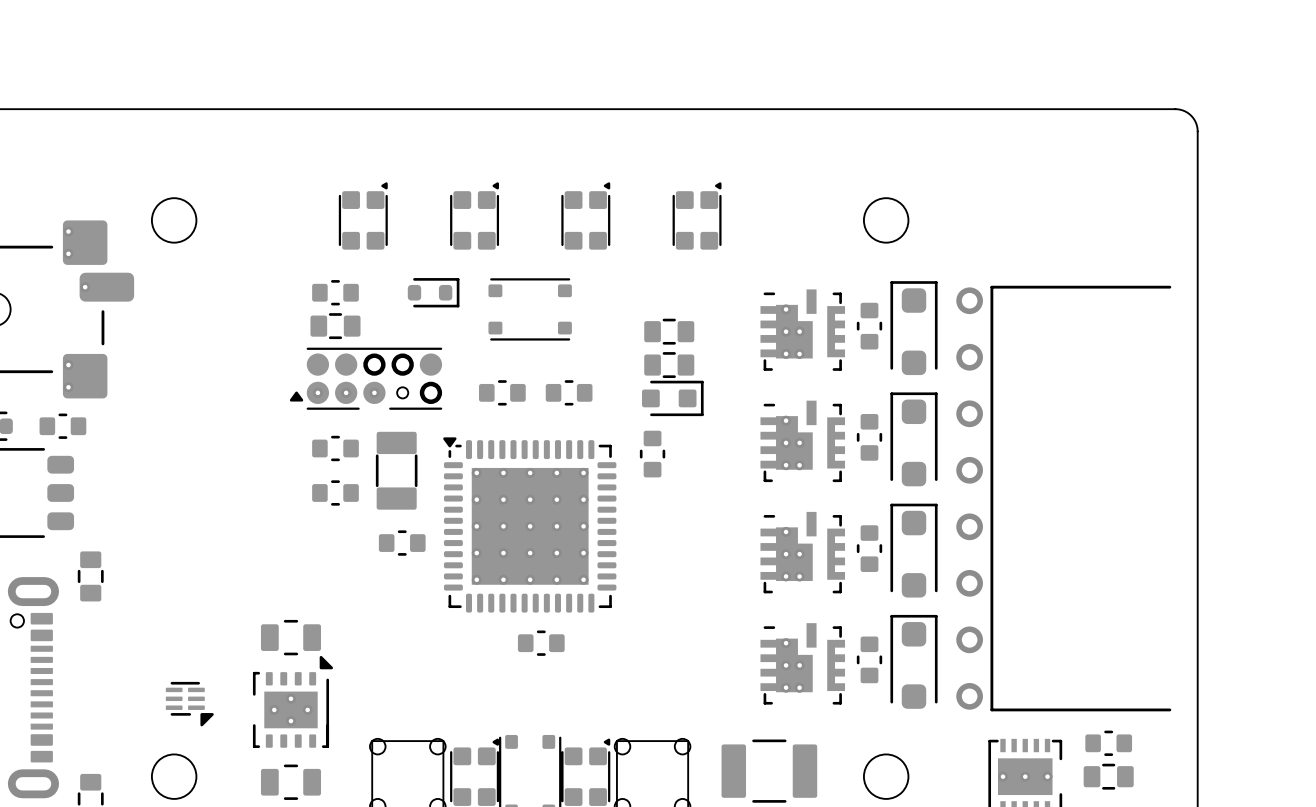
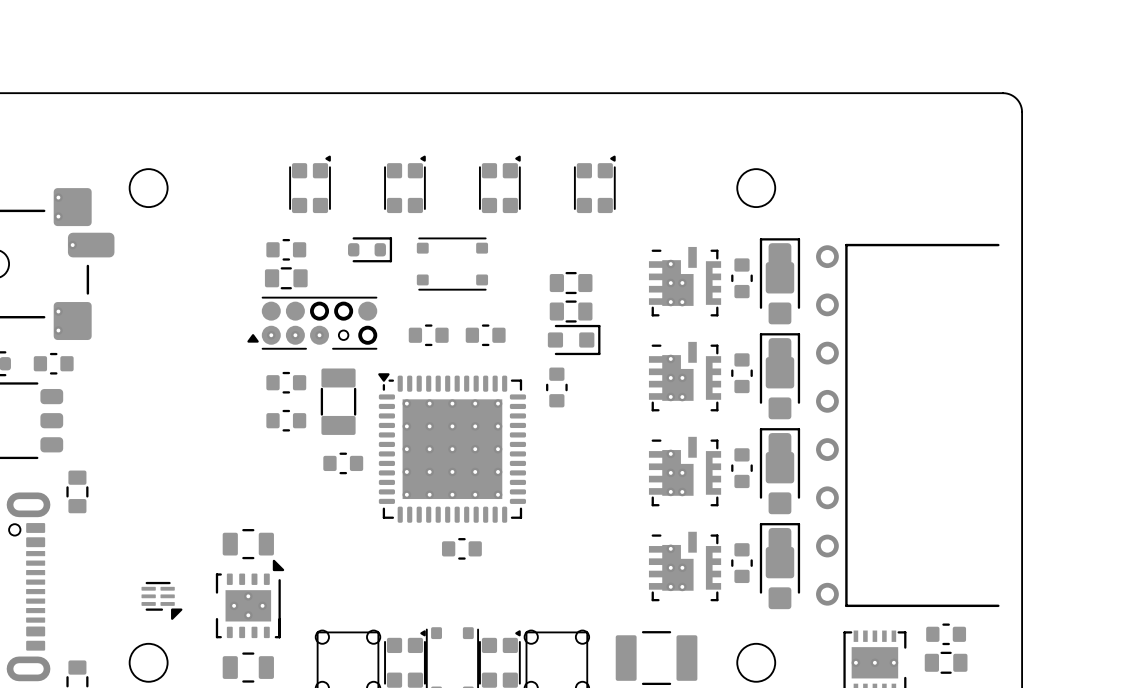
part footprint: [890, 281, 938, 376] -> [759, 238, 801, 325]
part footprint: [890, 392, 938, 487] -> [759, 333, 801, 420]
part footprint: [890, 503, 938, 598] -> [759, 428, 801, 515]
part footprint: [890, 614, 938, 709] -> [759, 523, 801, 610]

